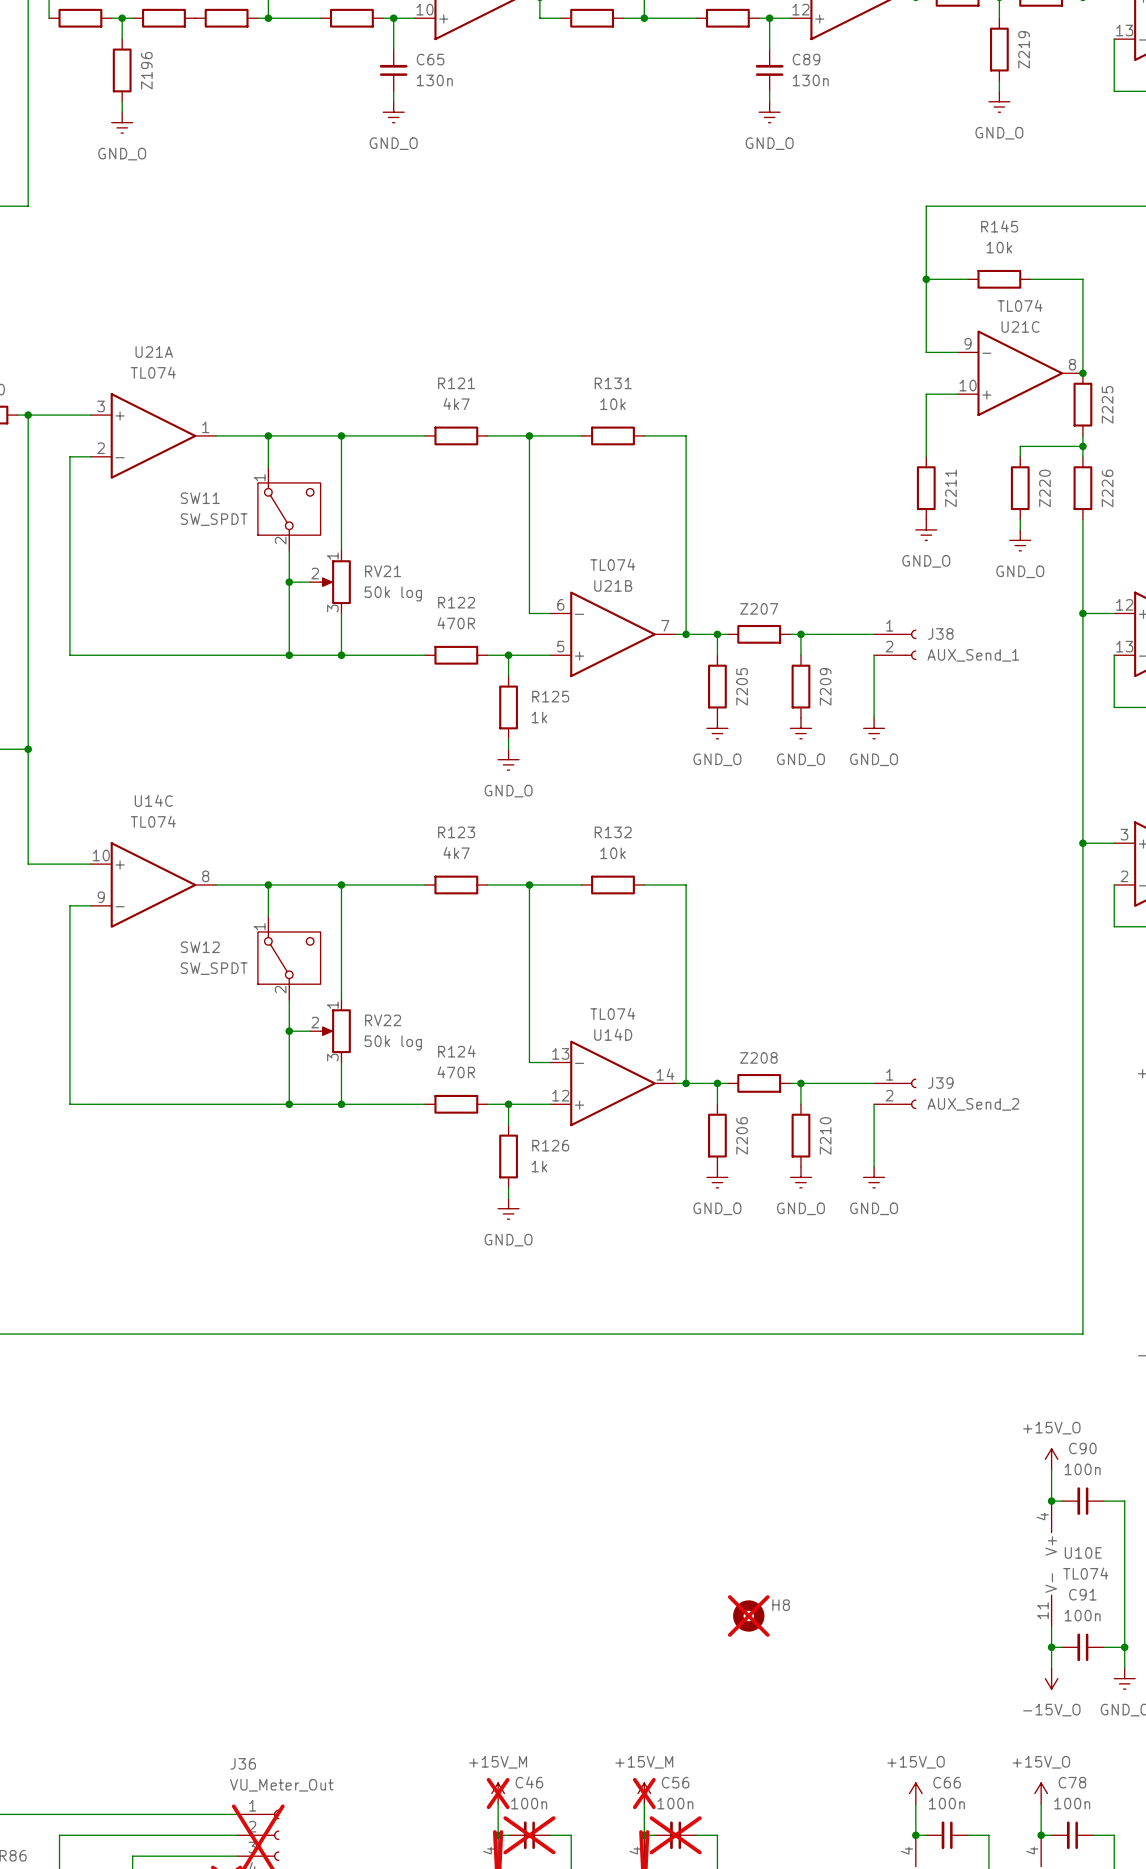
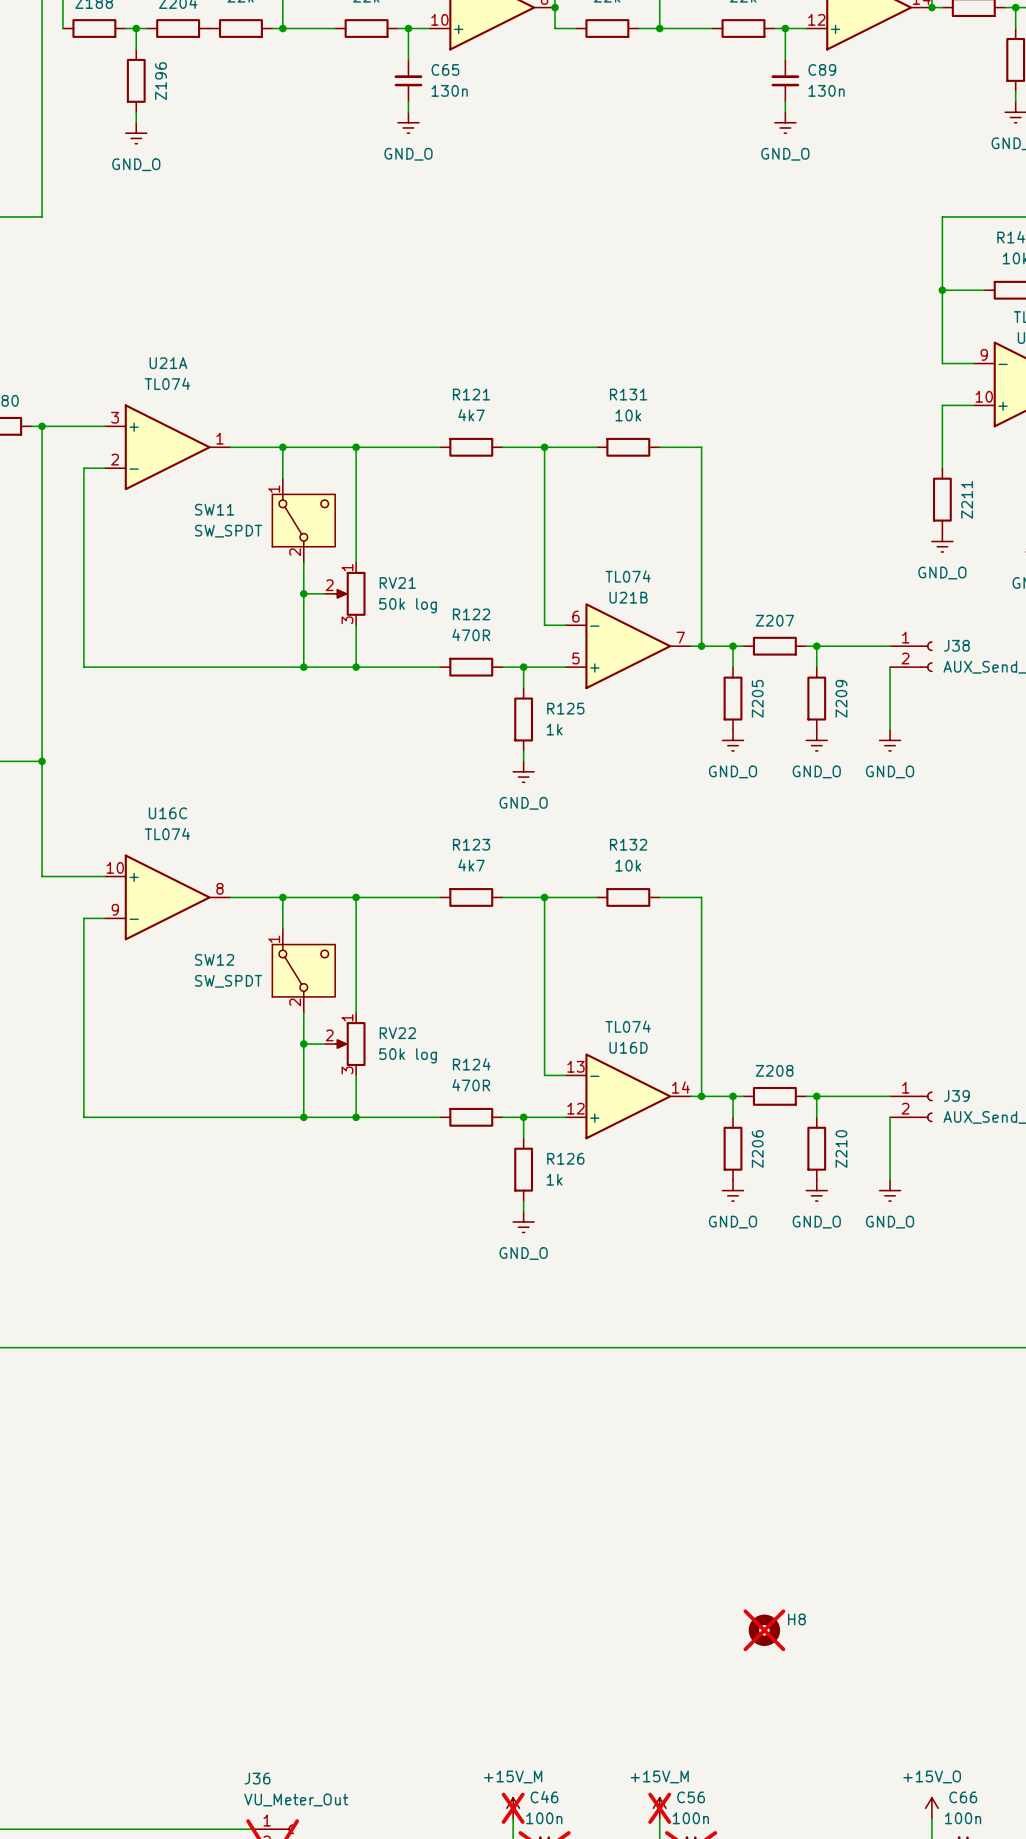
U14C name: U14C (153, 800) -> U16C (167, 813)
U14D name: U14D (613, 1034) -> U16D (628, 1047)

